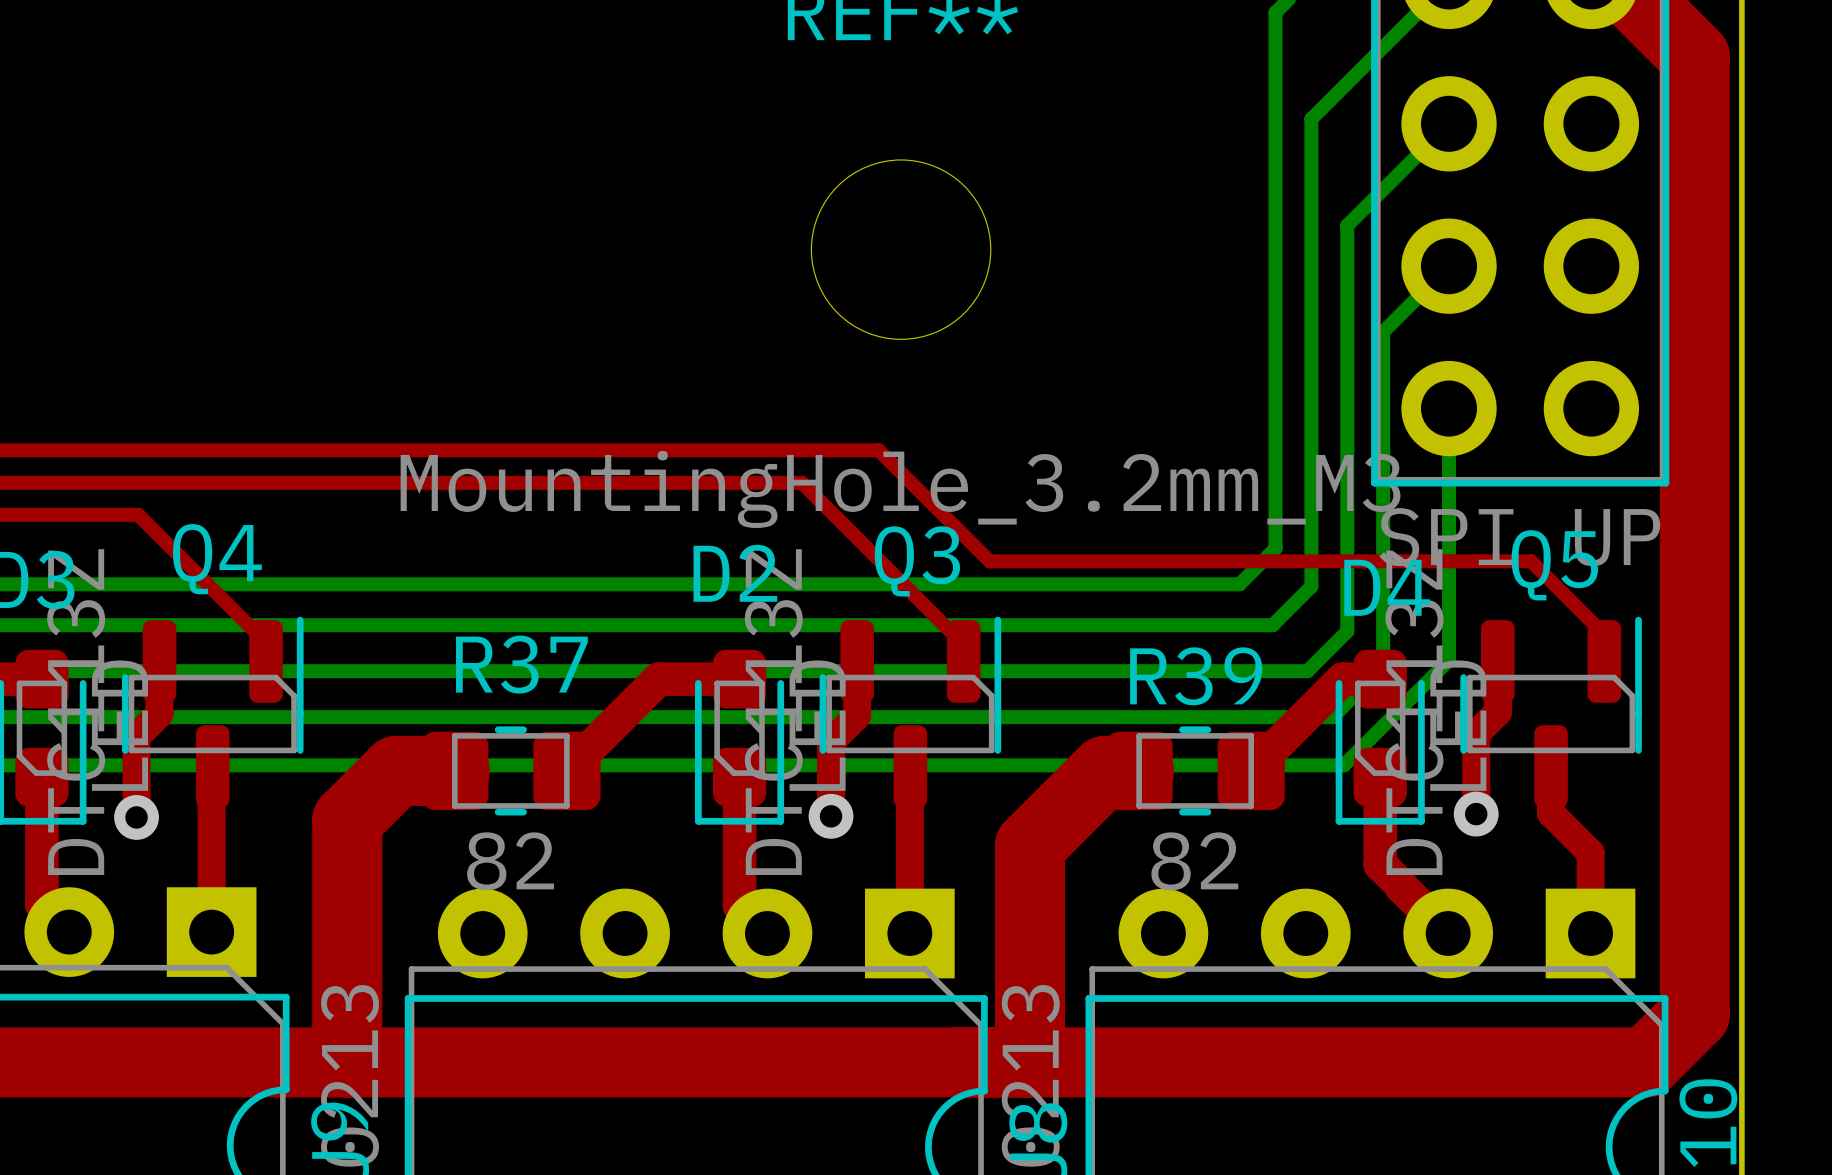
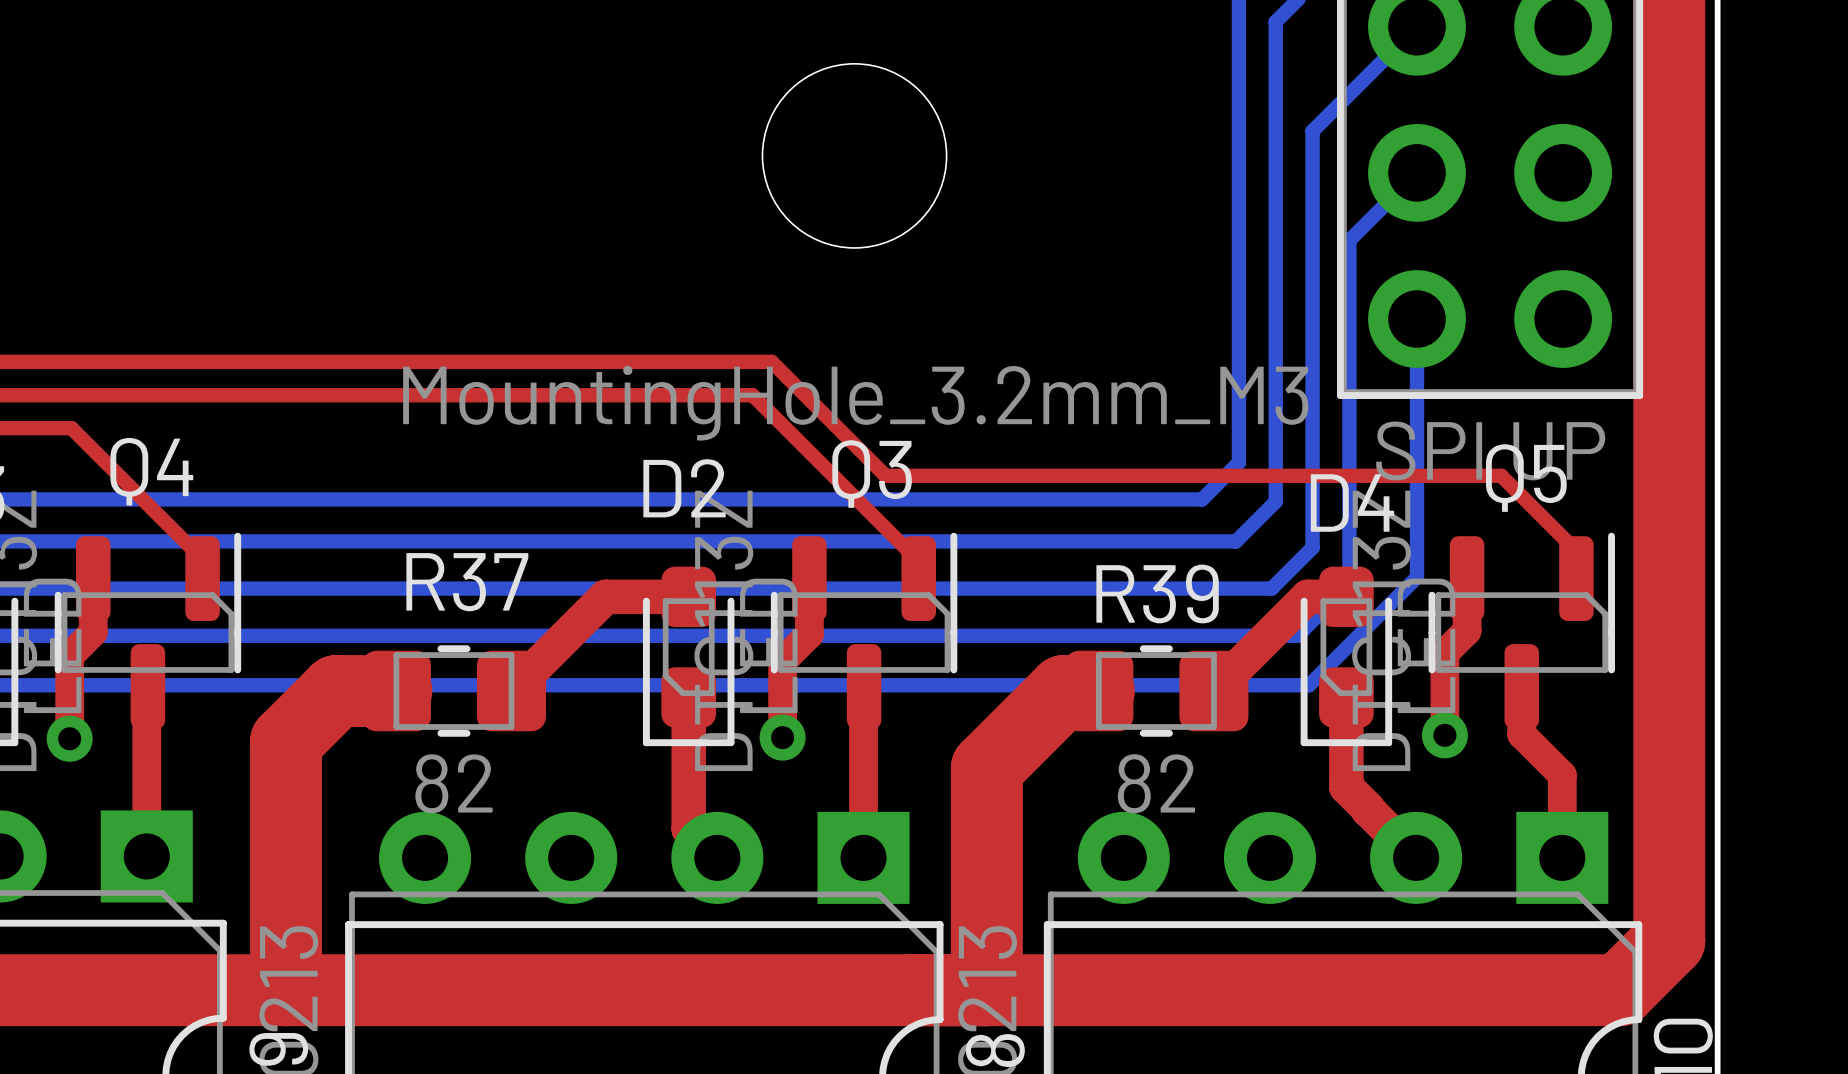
top track: (820, 450) (878, 450) (989, 561) -> (771, 361) (885, 475) (945, 475)

